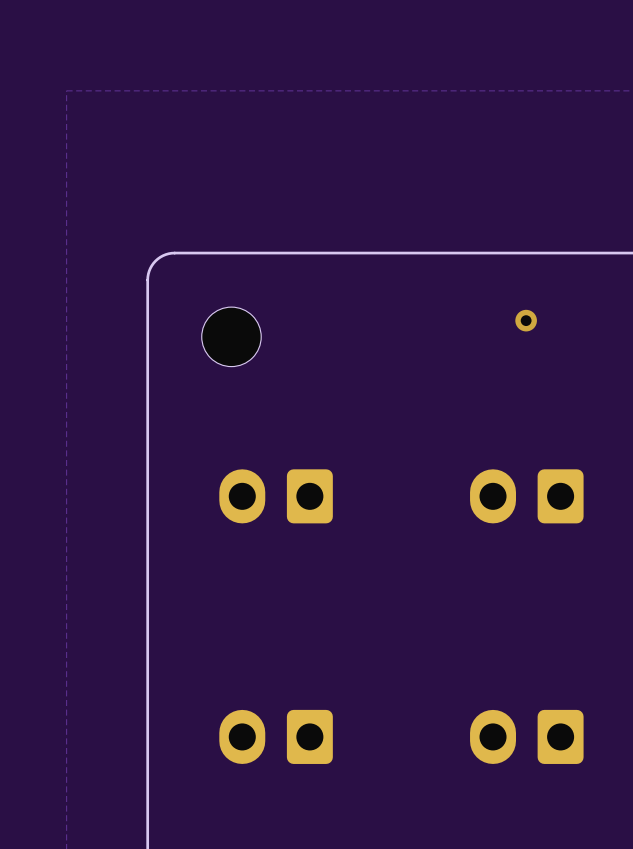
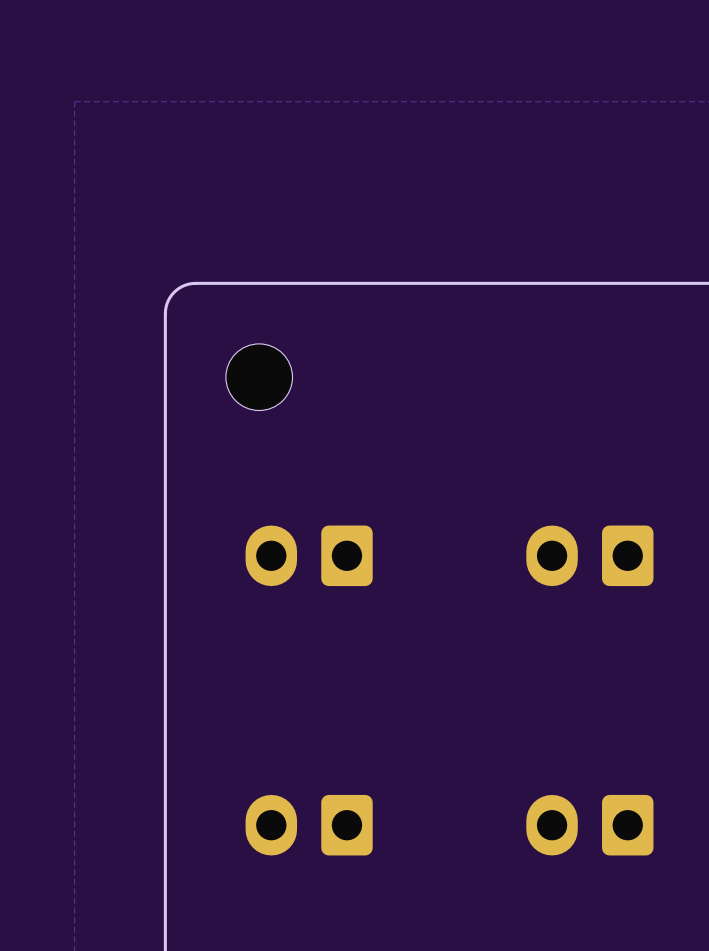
via: (526, 320) -> none

